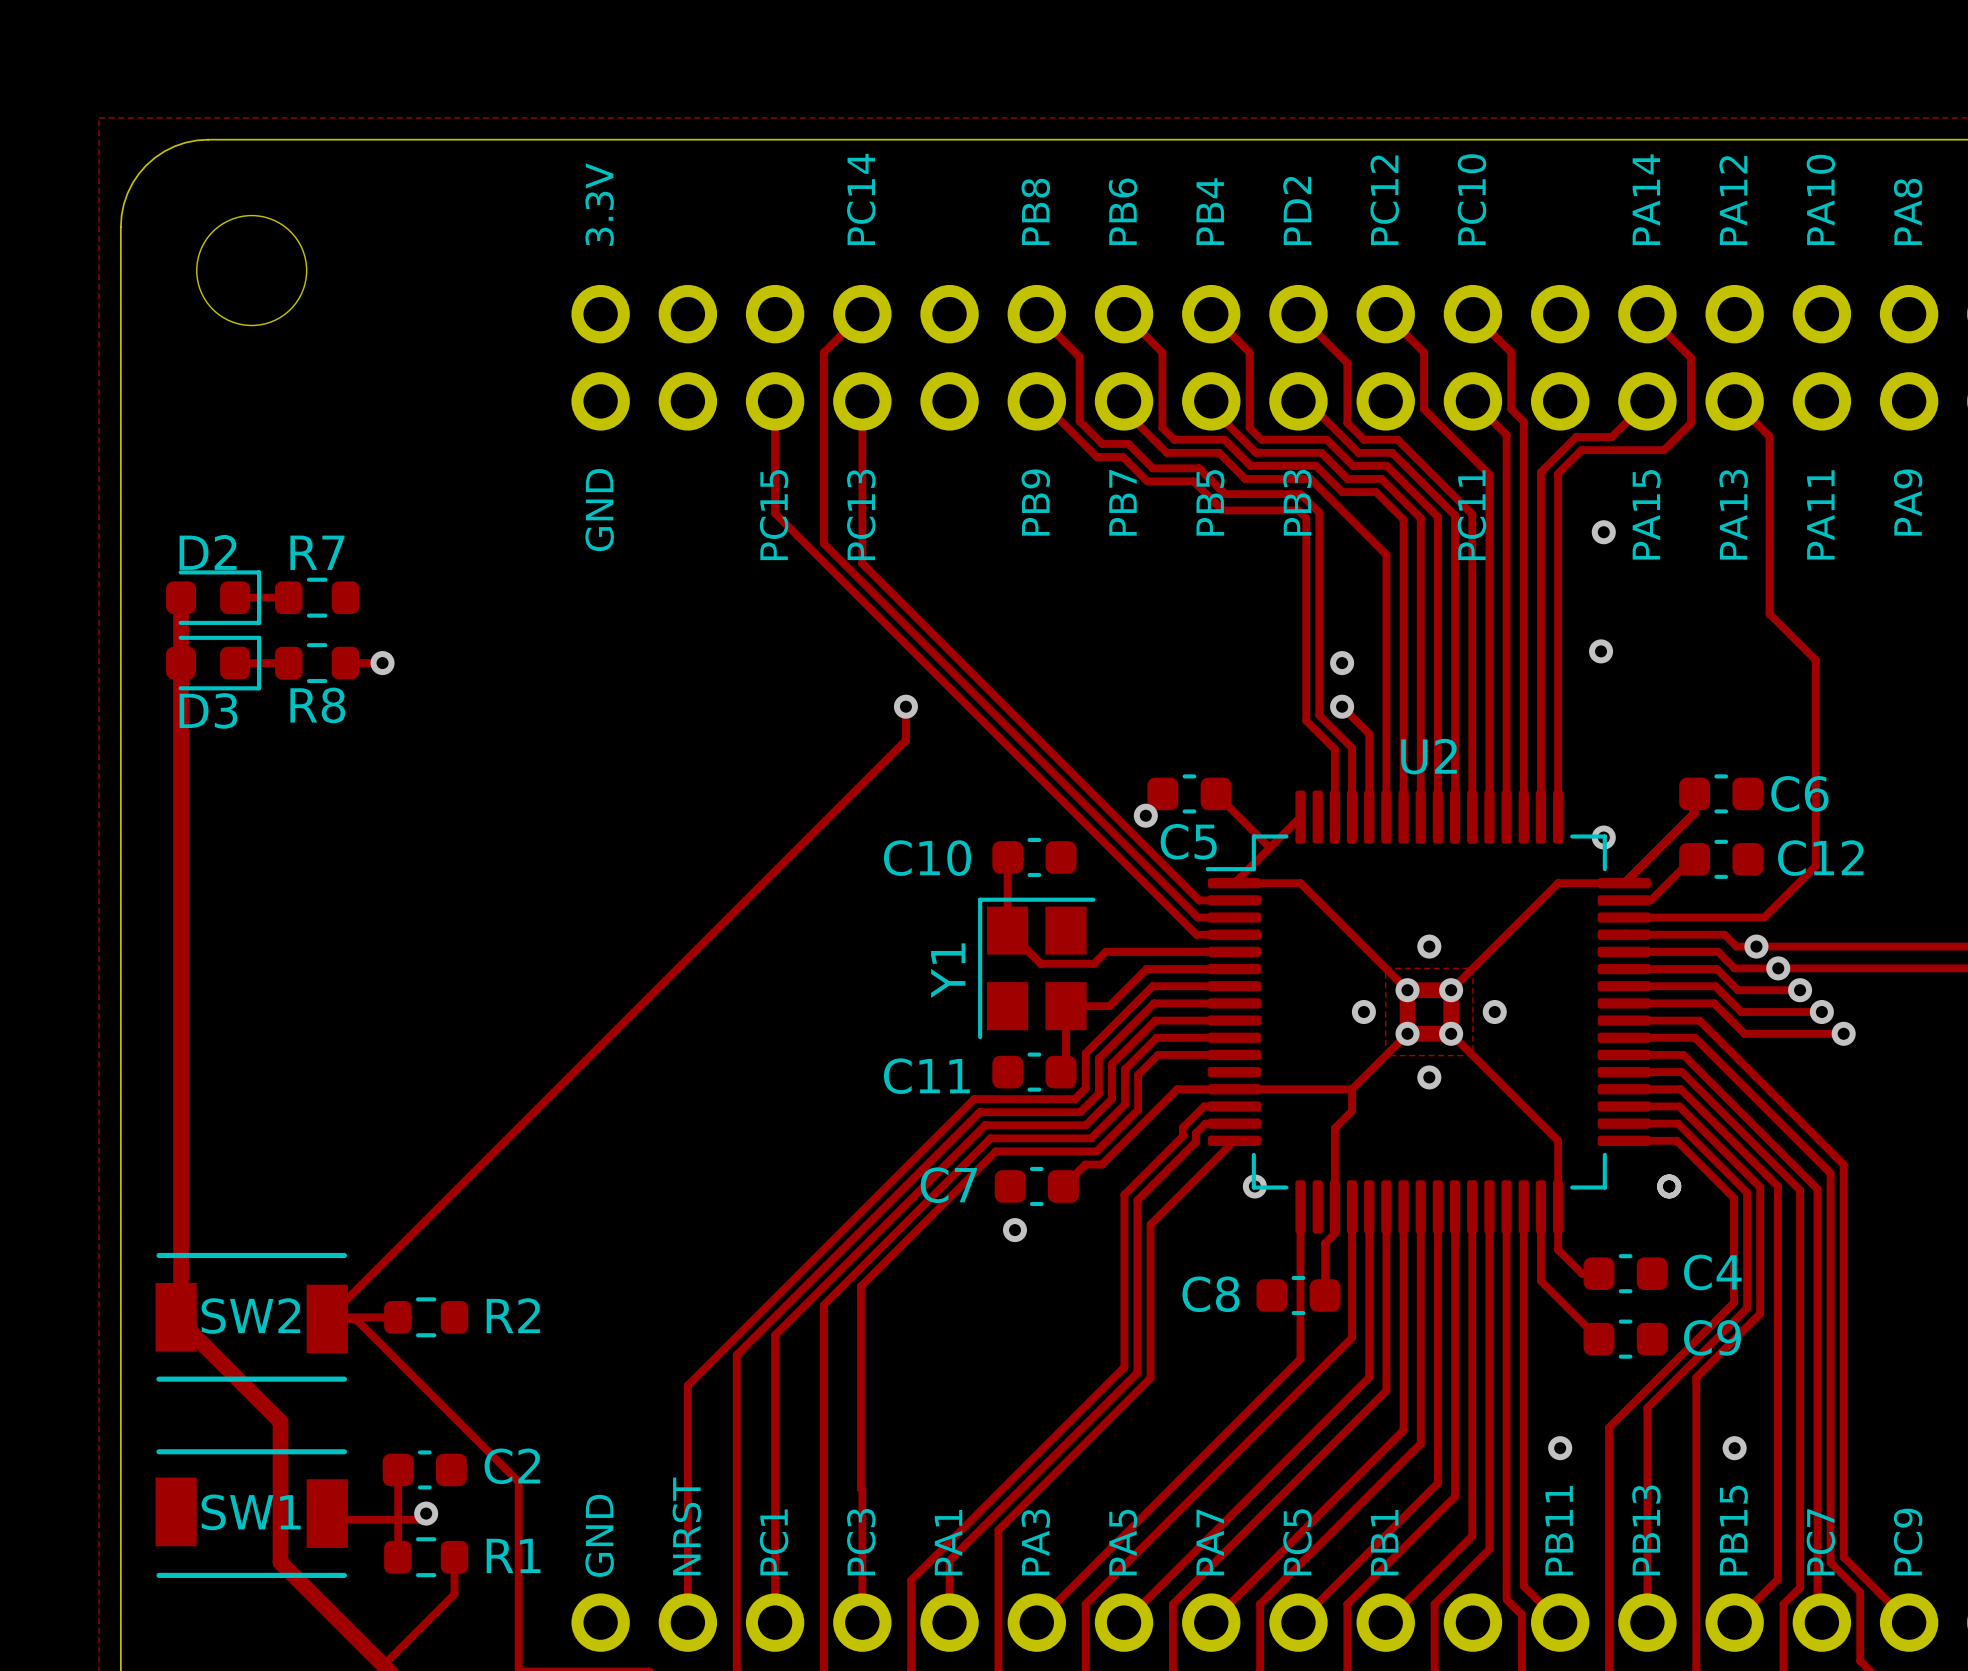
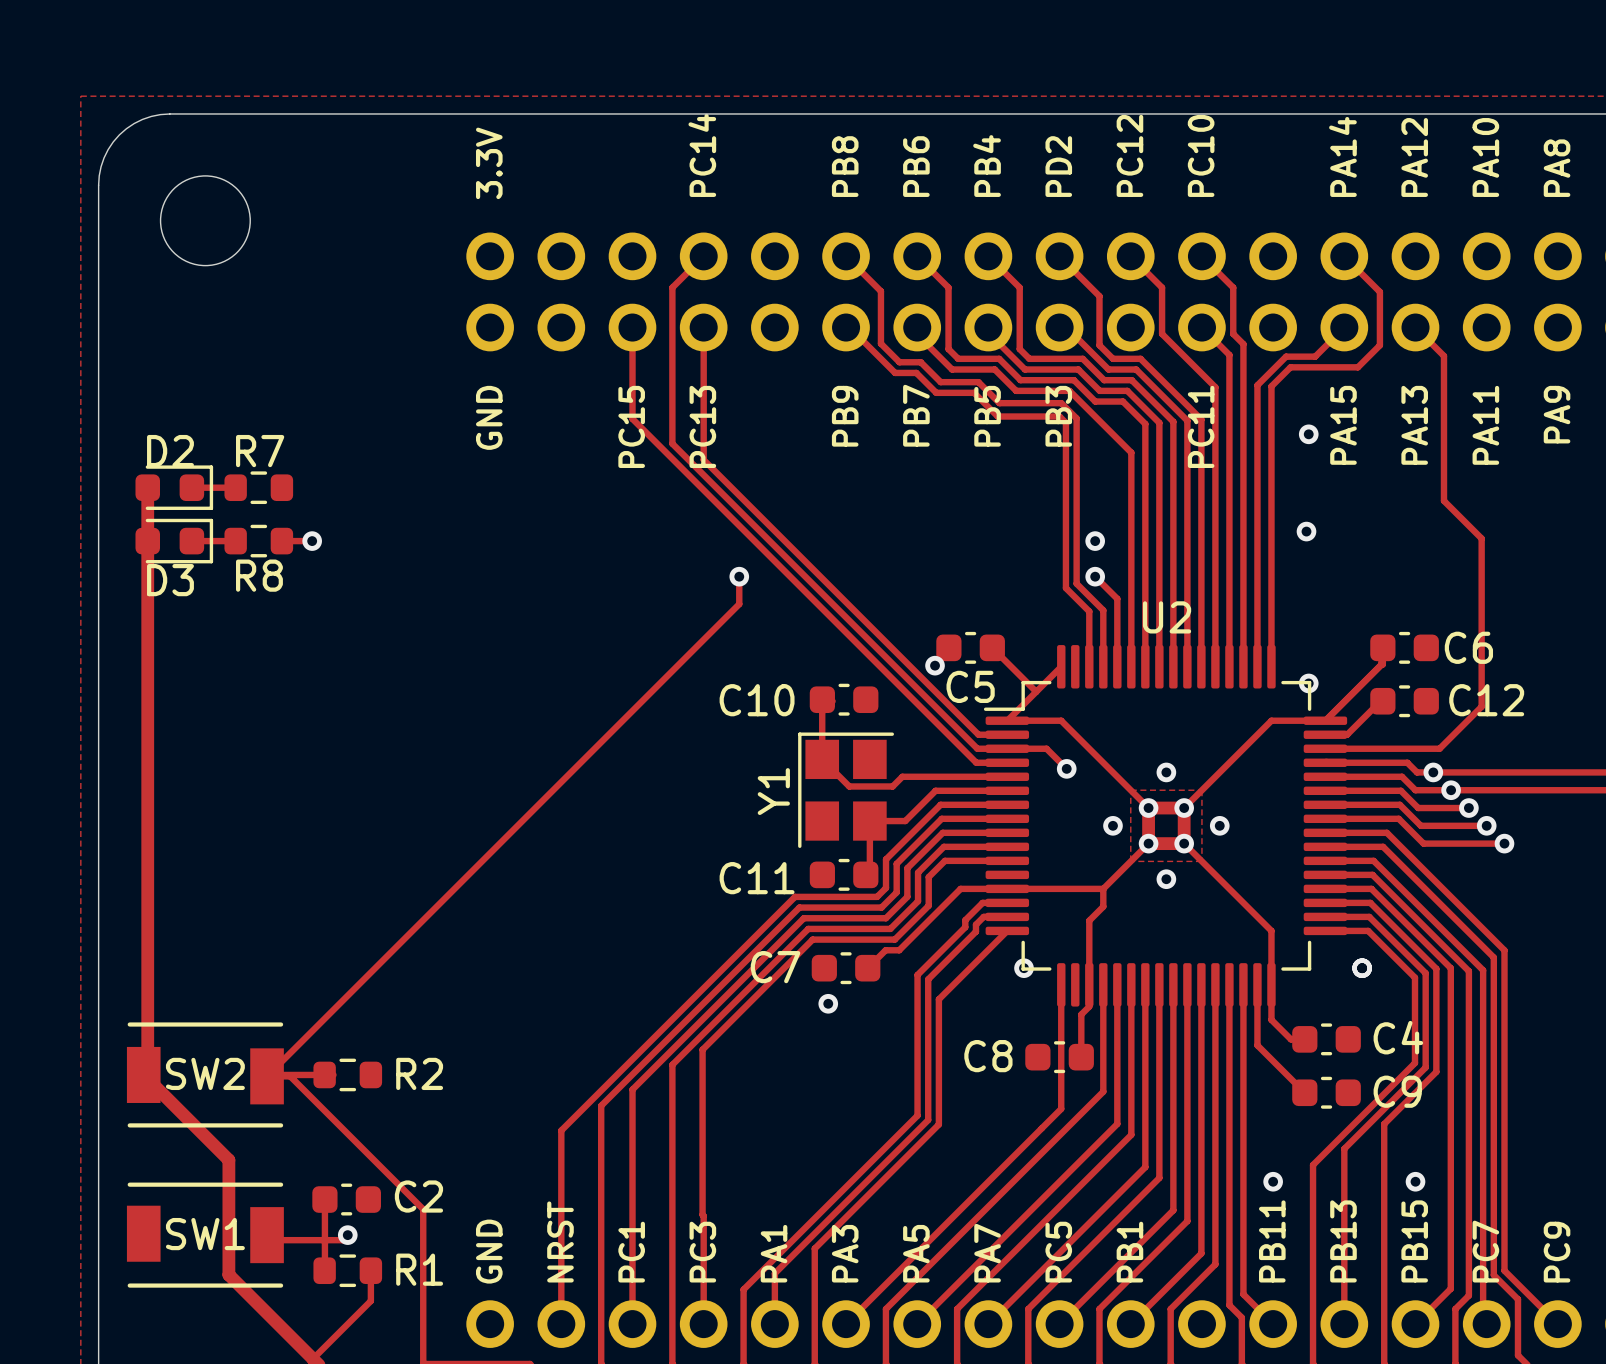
track: none -> (1007, 748) (1046, 748) (1066, 768)
via: none -> (1066, 768)

